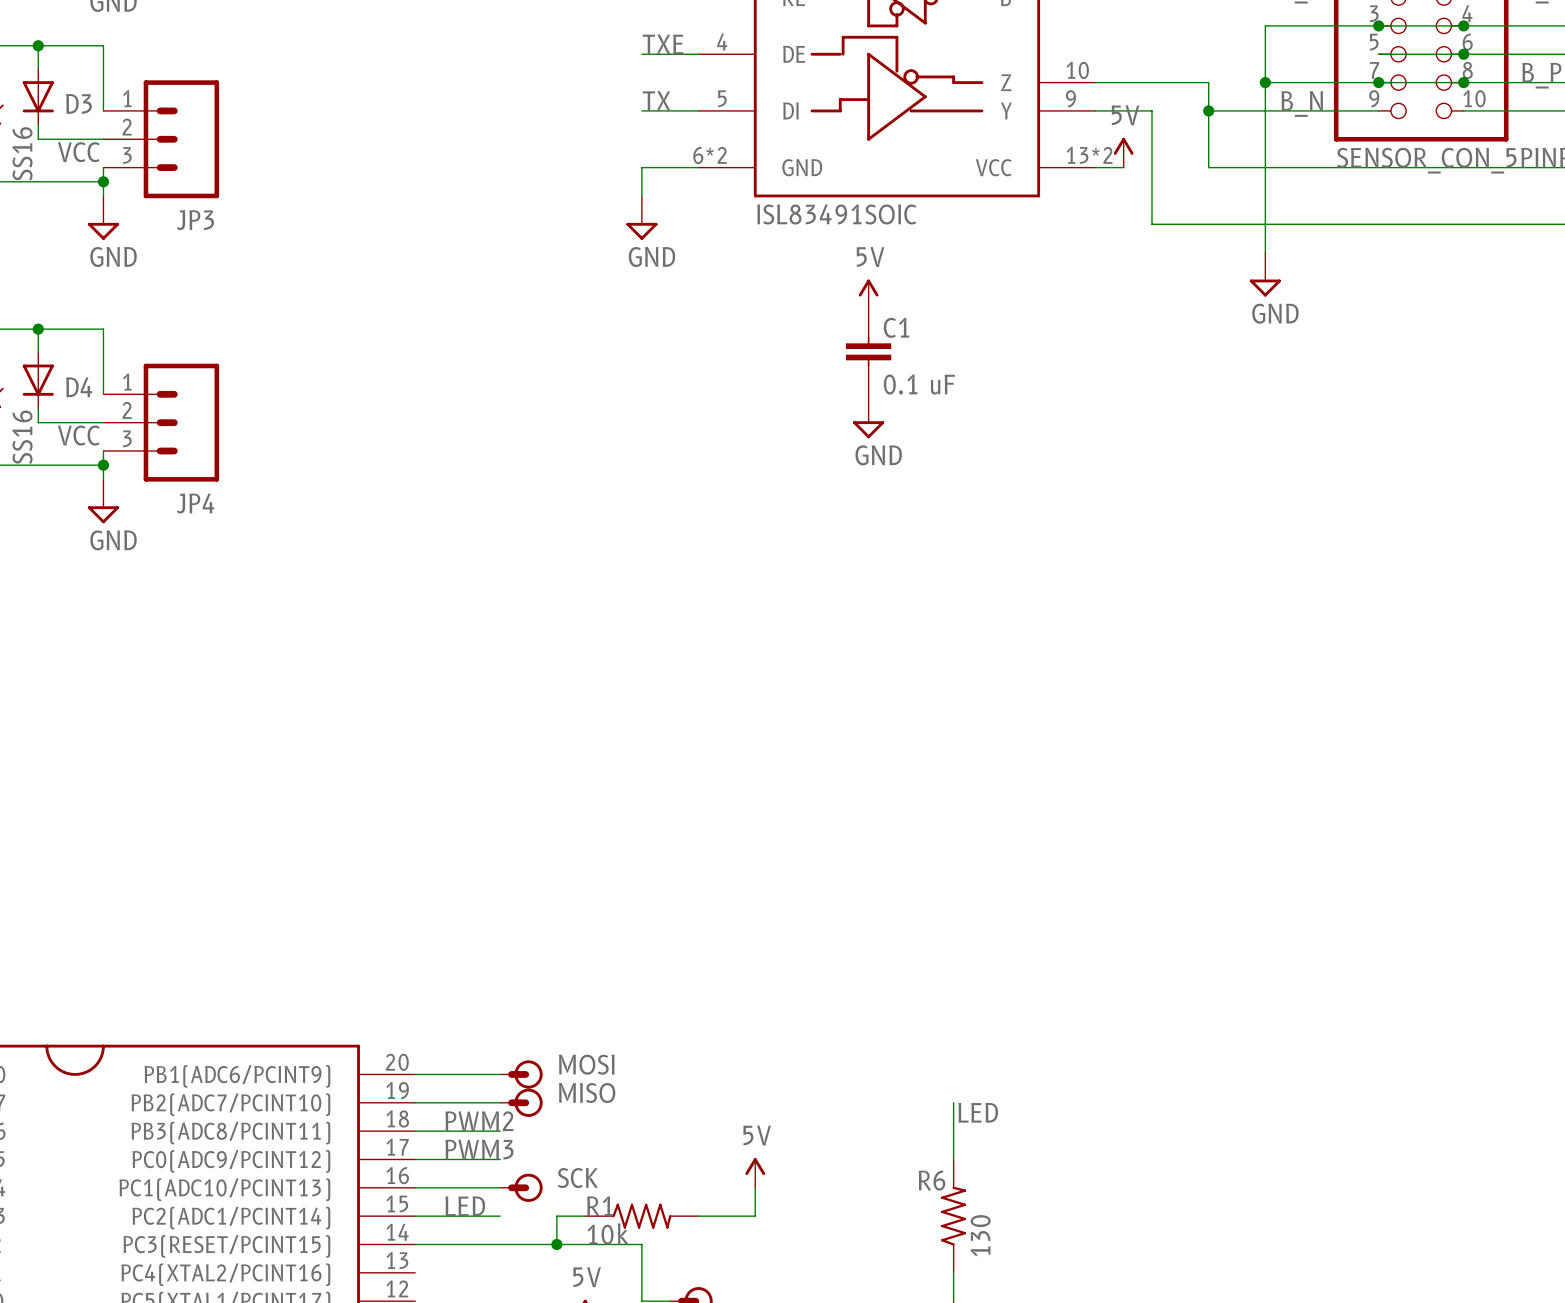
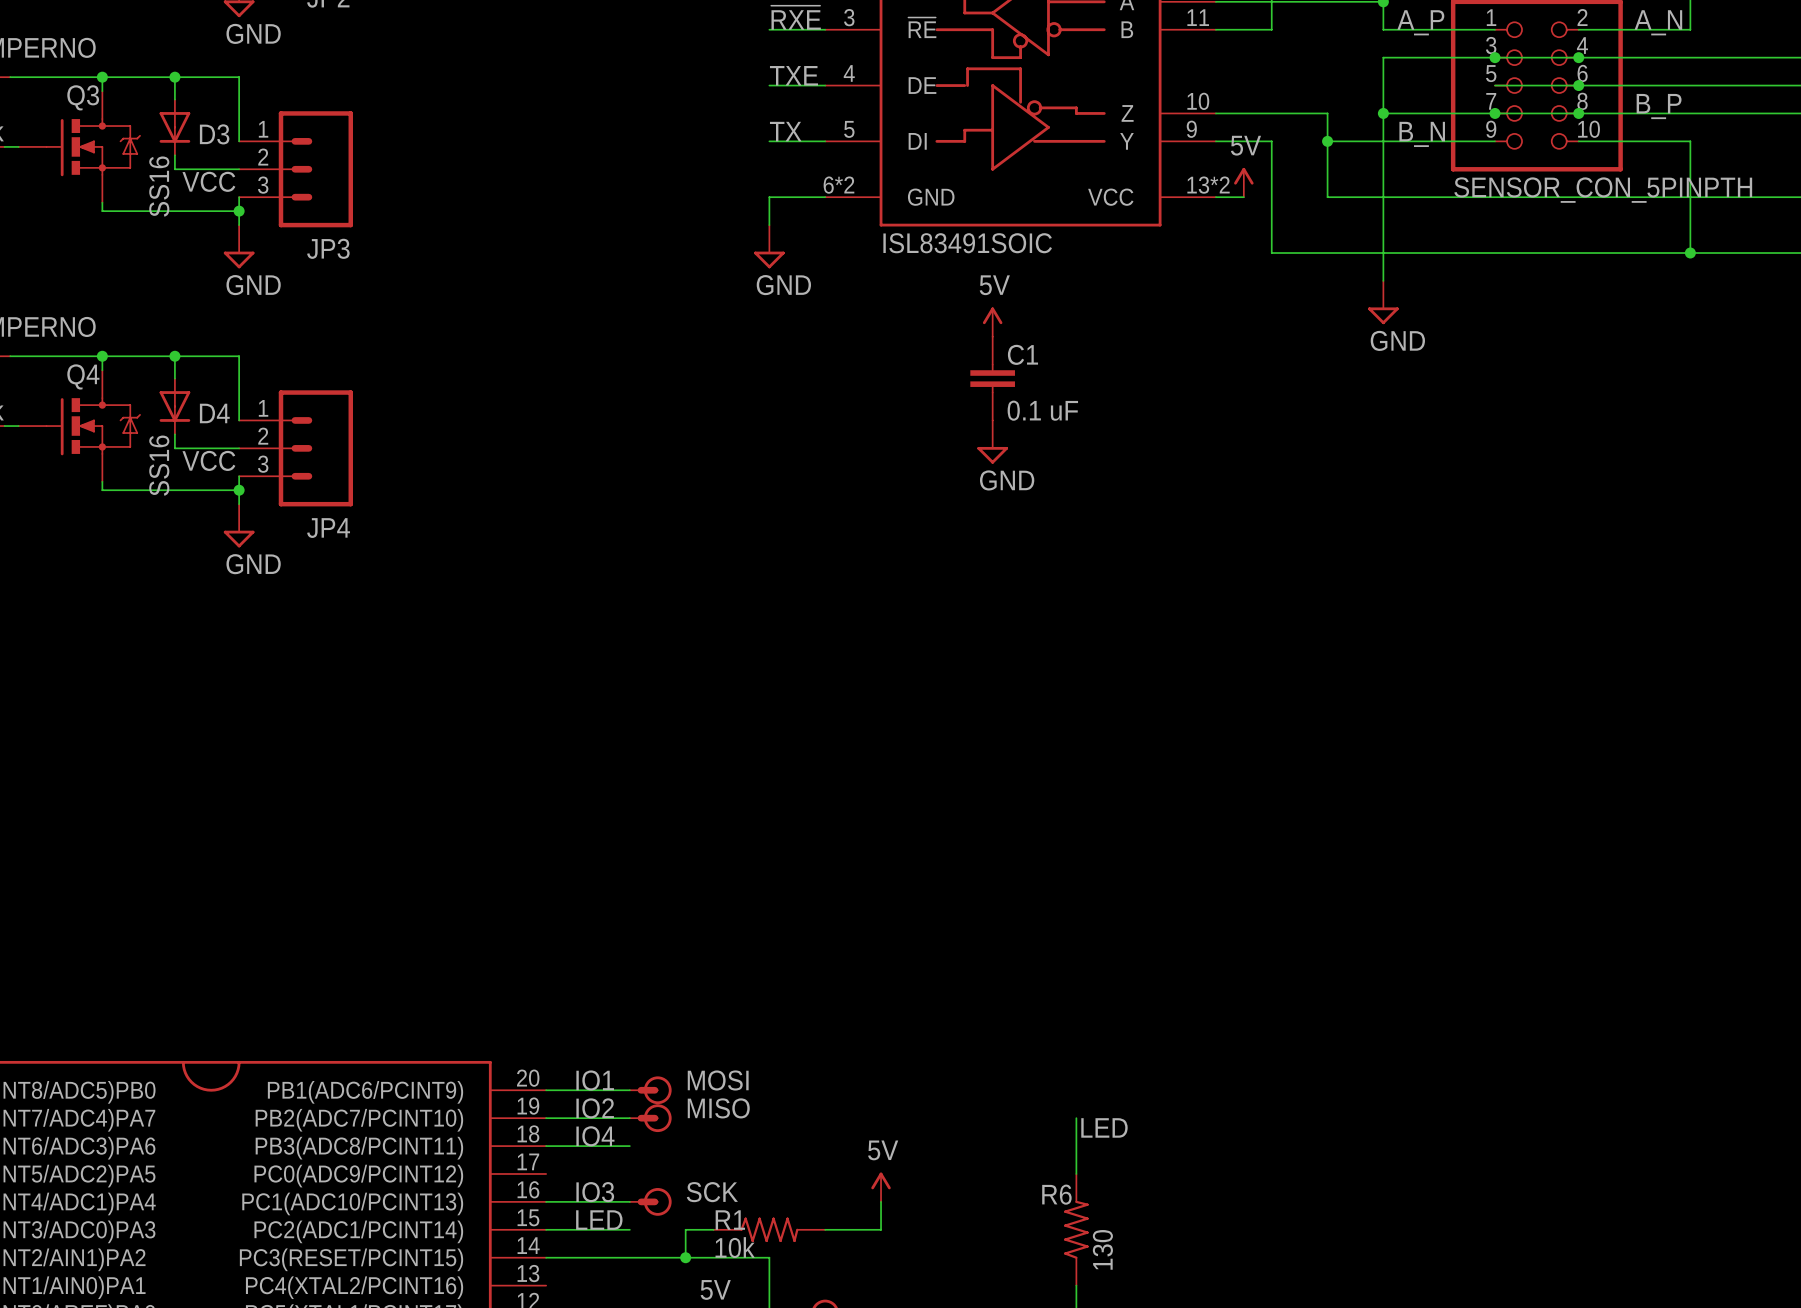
label: none -> IO1 (595, 1080)
label: none -> IO2 (595, 1108)
label: PWM2 (479, 1121) -> IO4 (595, 1136)
label: PWM3 (479, 1149) -> none
wire: (415, 1159) (500, 1159) -> none
label: none -> IO3 (595, 1192)

